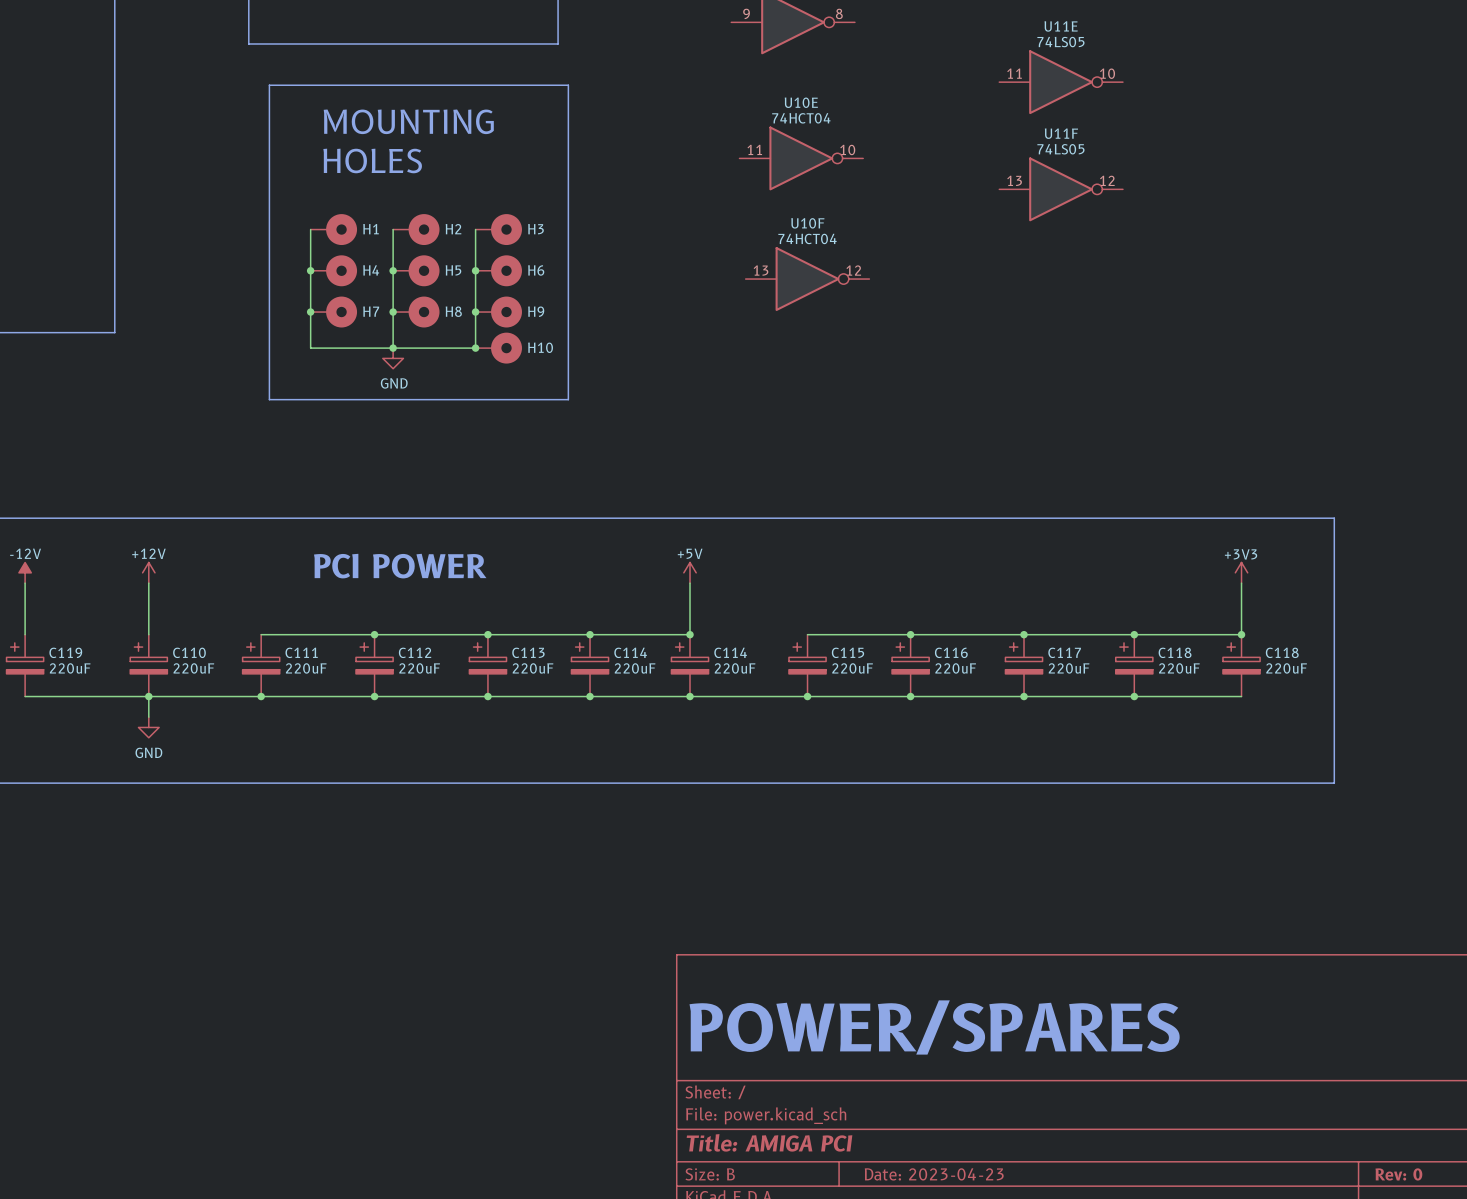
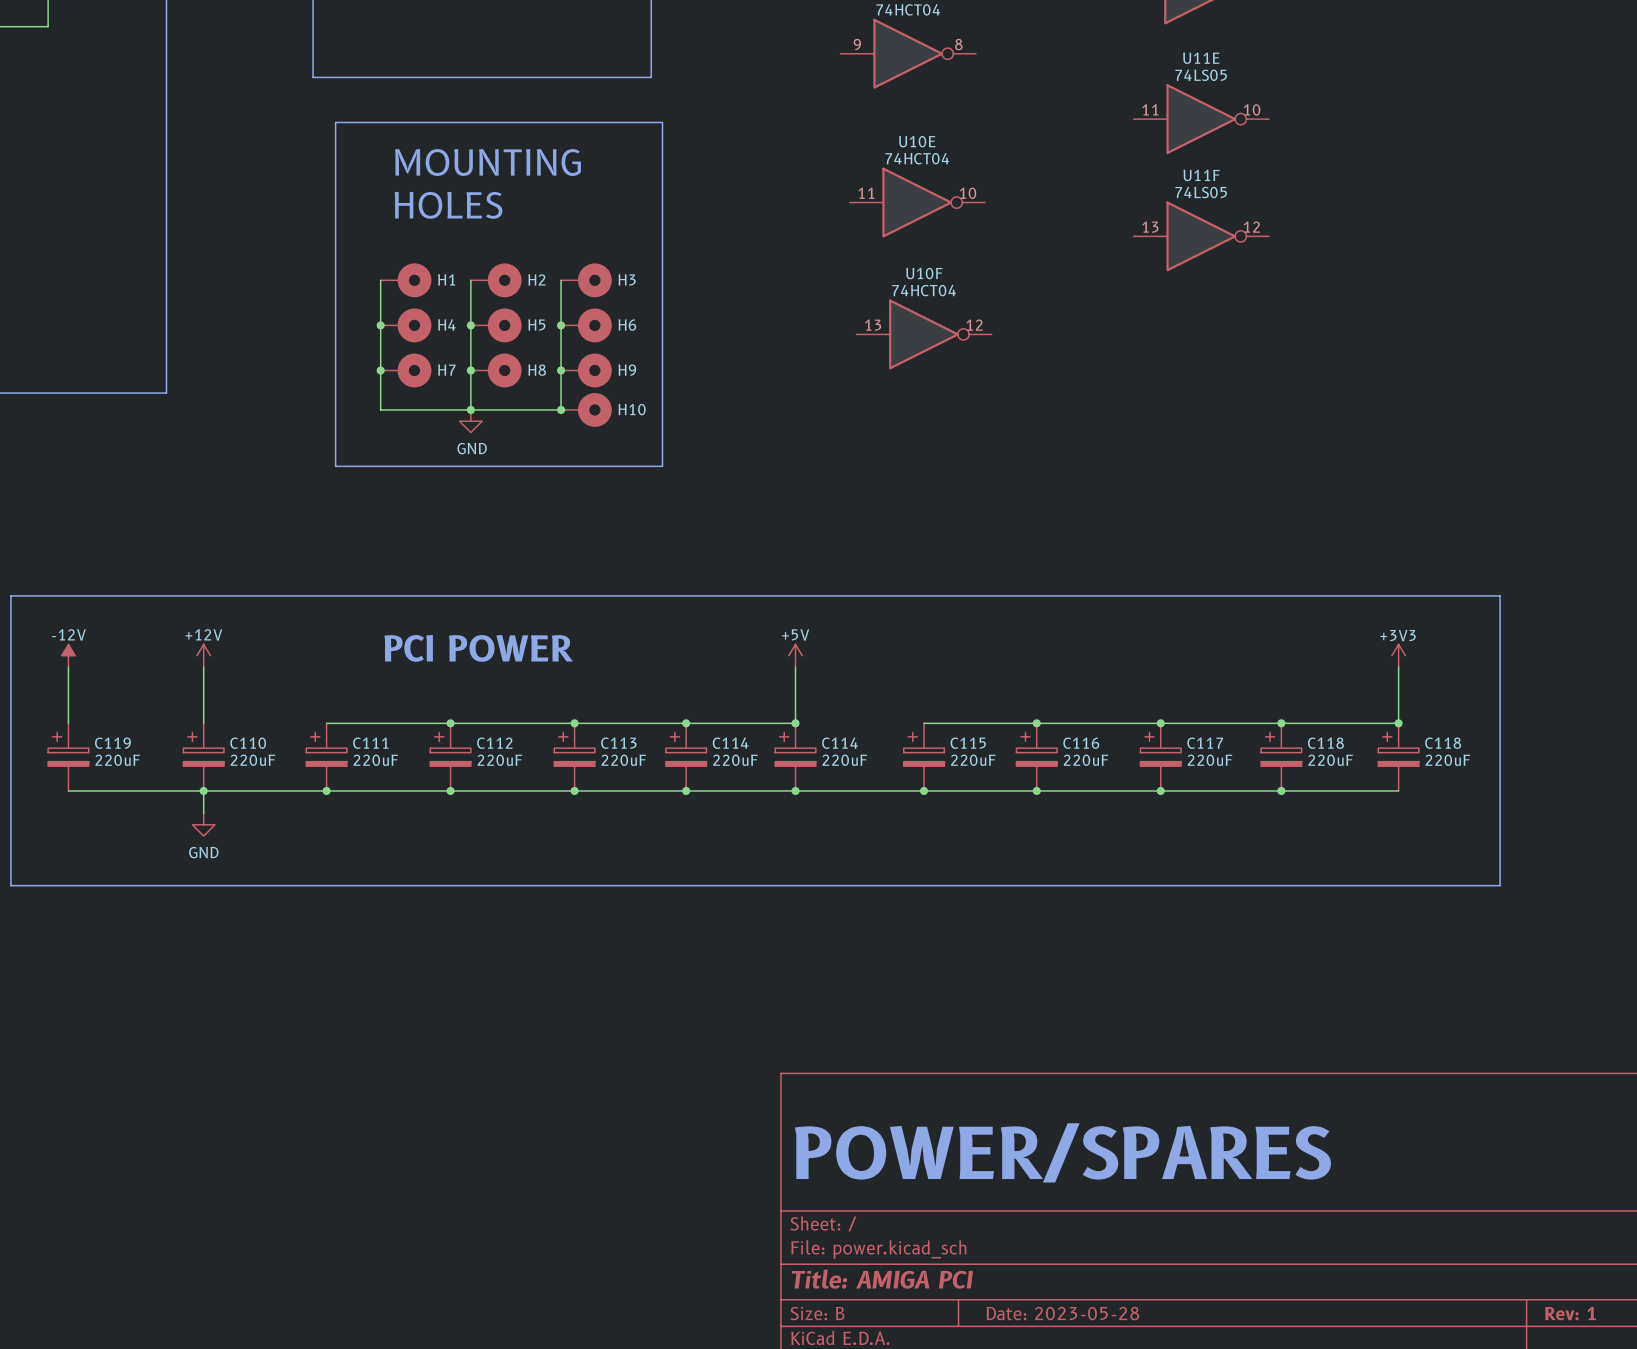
title block: Date: 2023-04-23 (934, 1174) -> Date: 2023-05-28 (1062, 1313)
title block: Rev: 0 (1398, 1174) -> Rev: 1 (1570, 1313)

